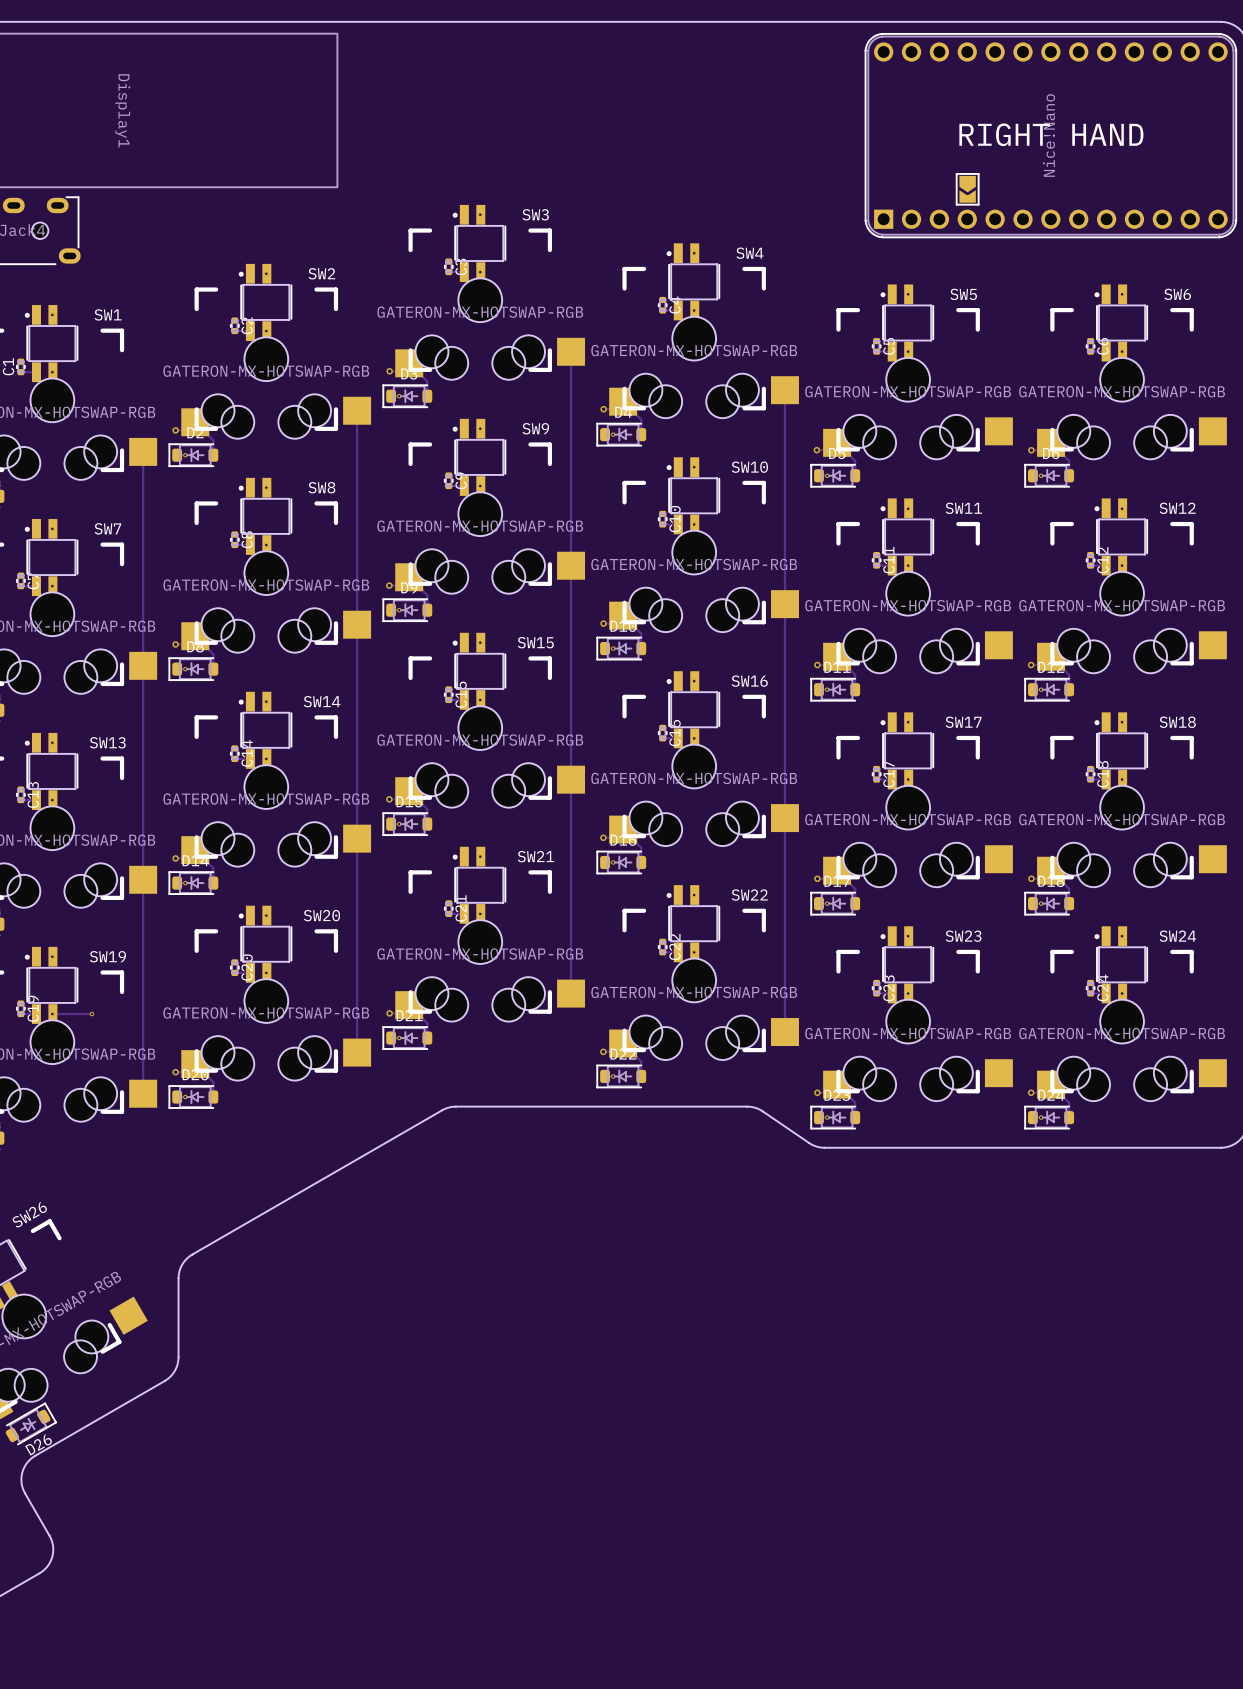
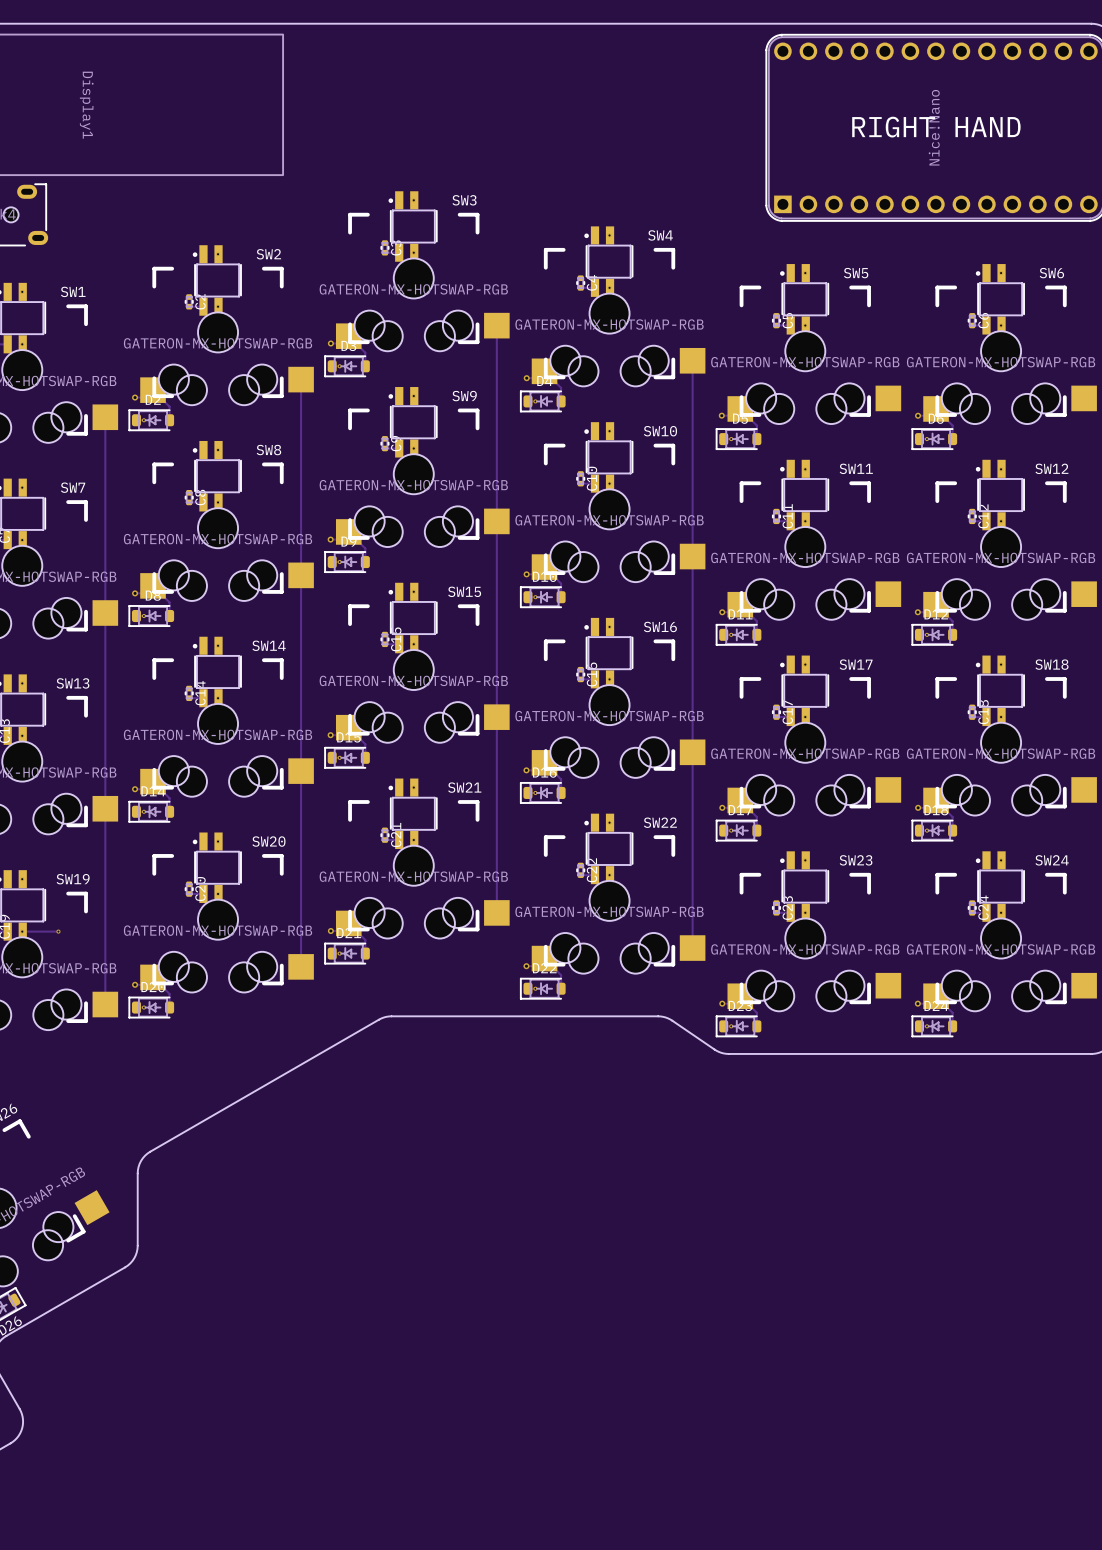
part: (967, 189) -> none

